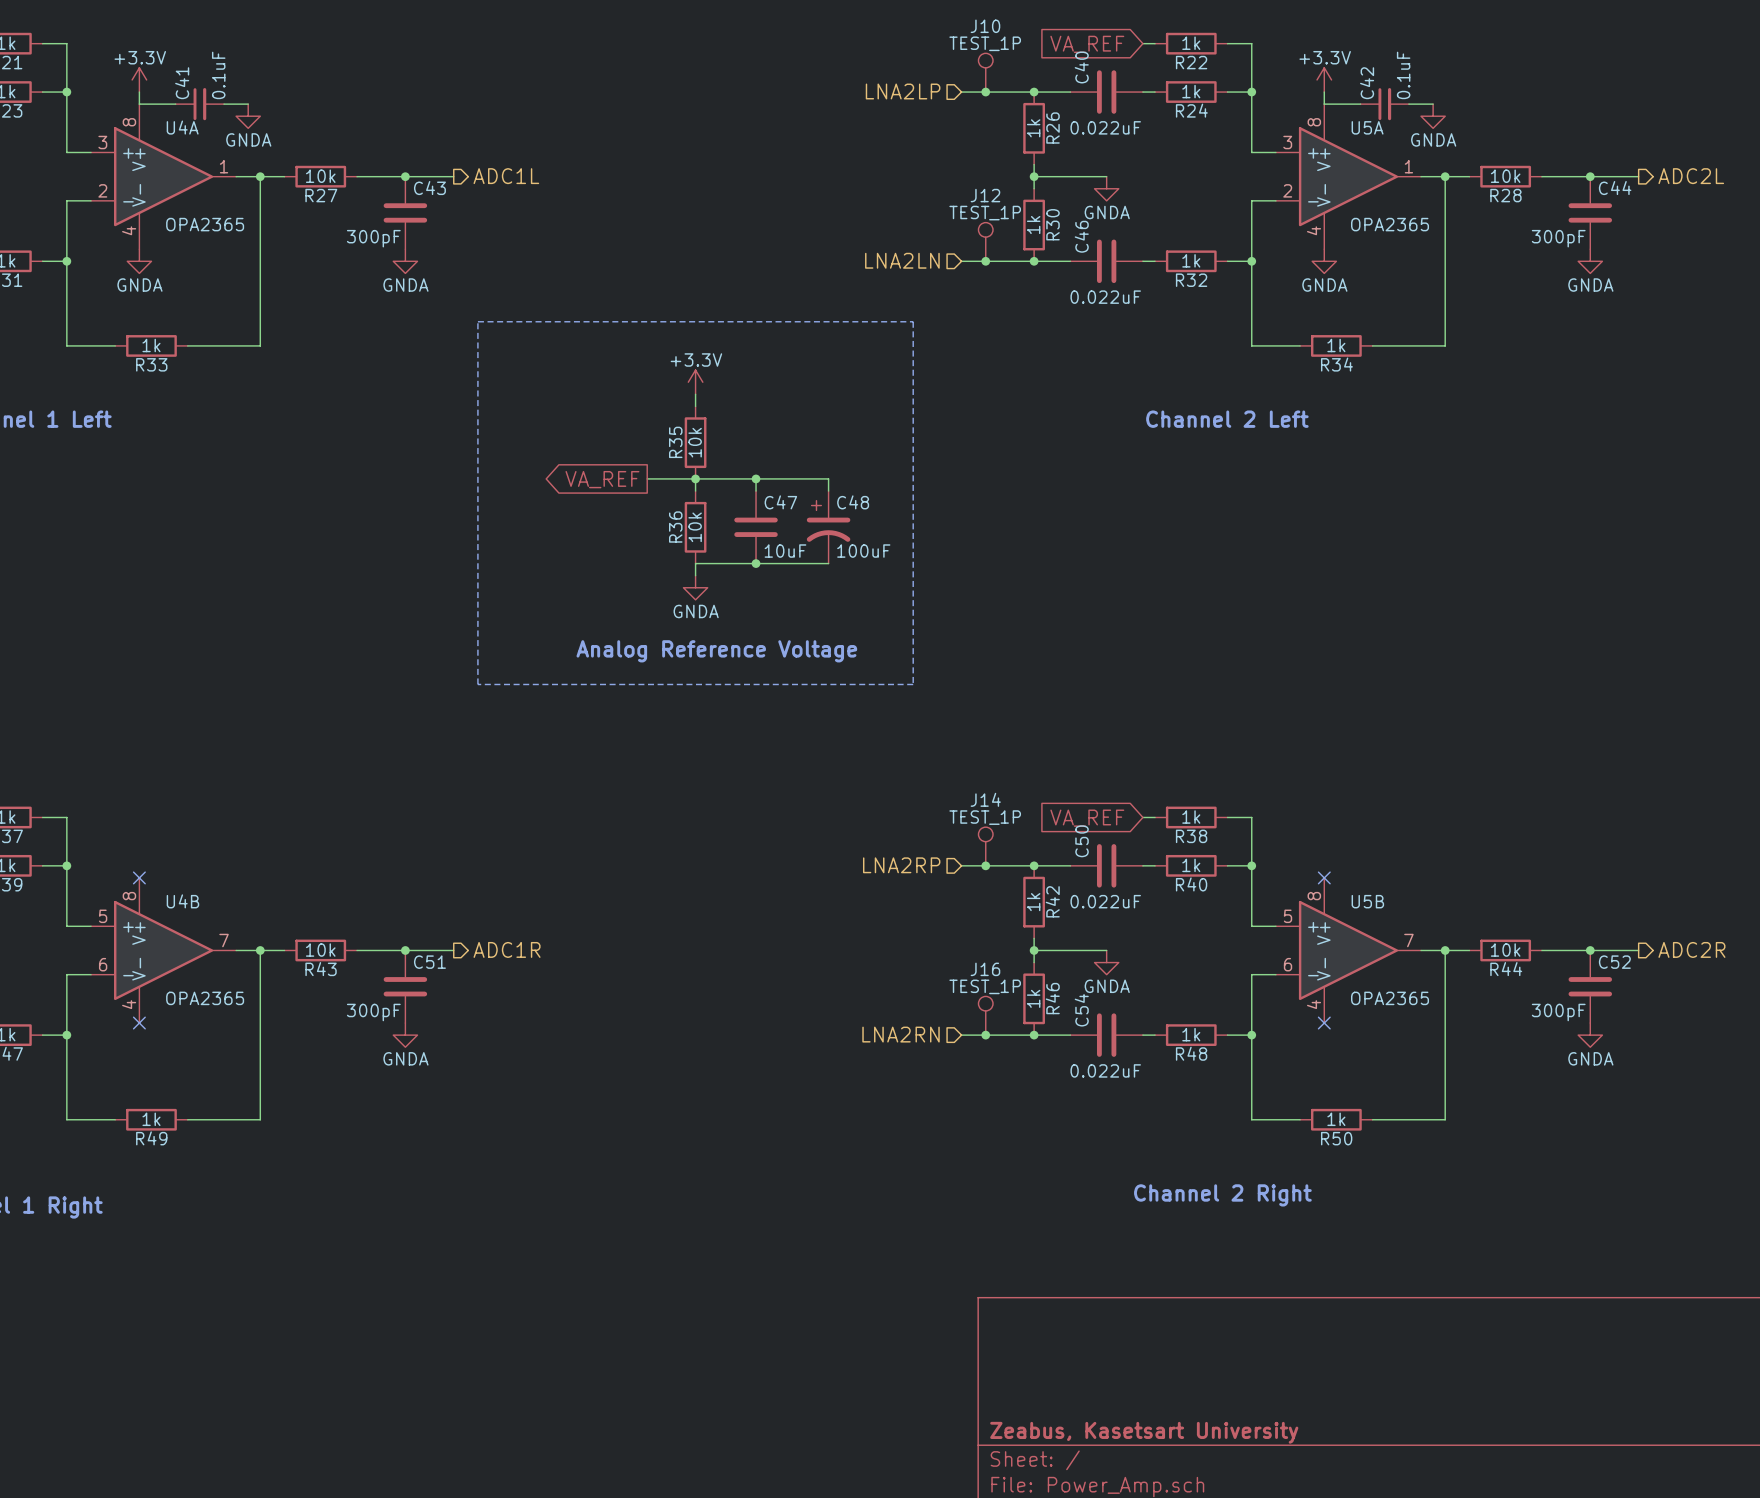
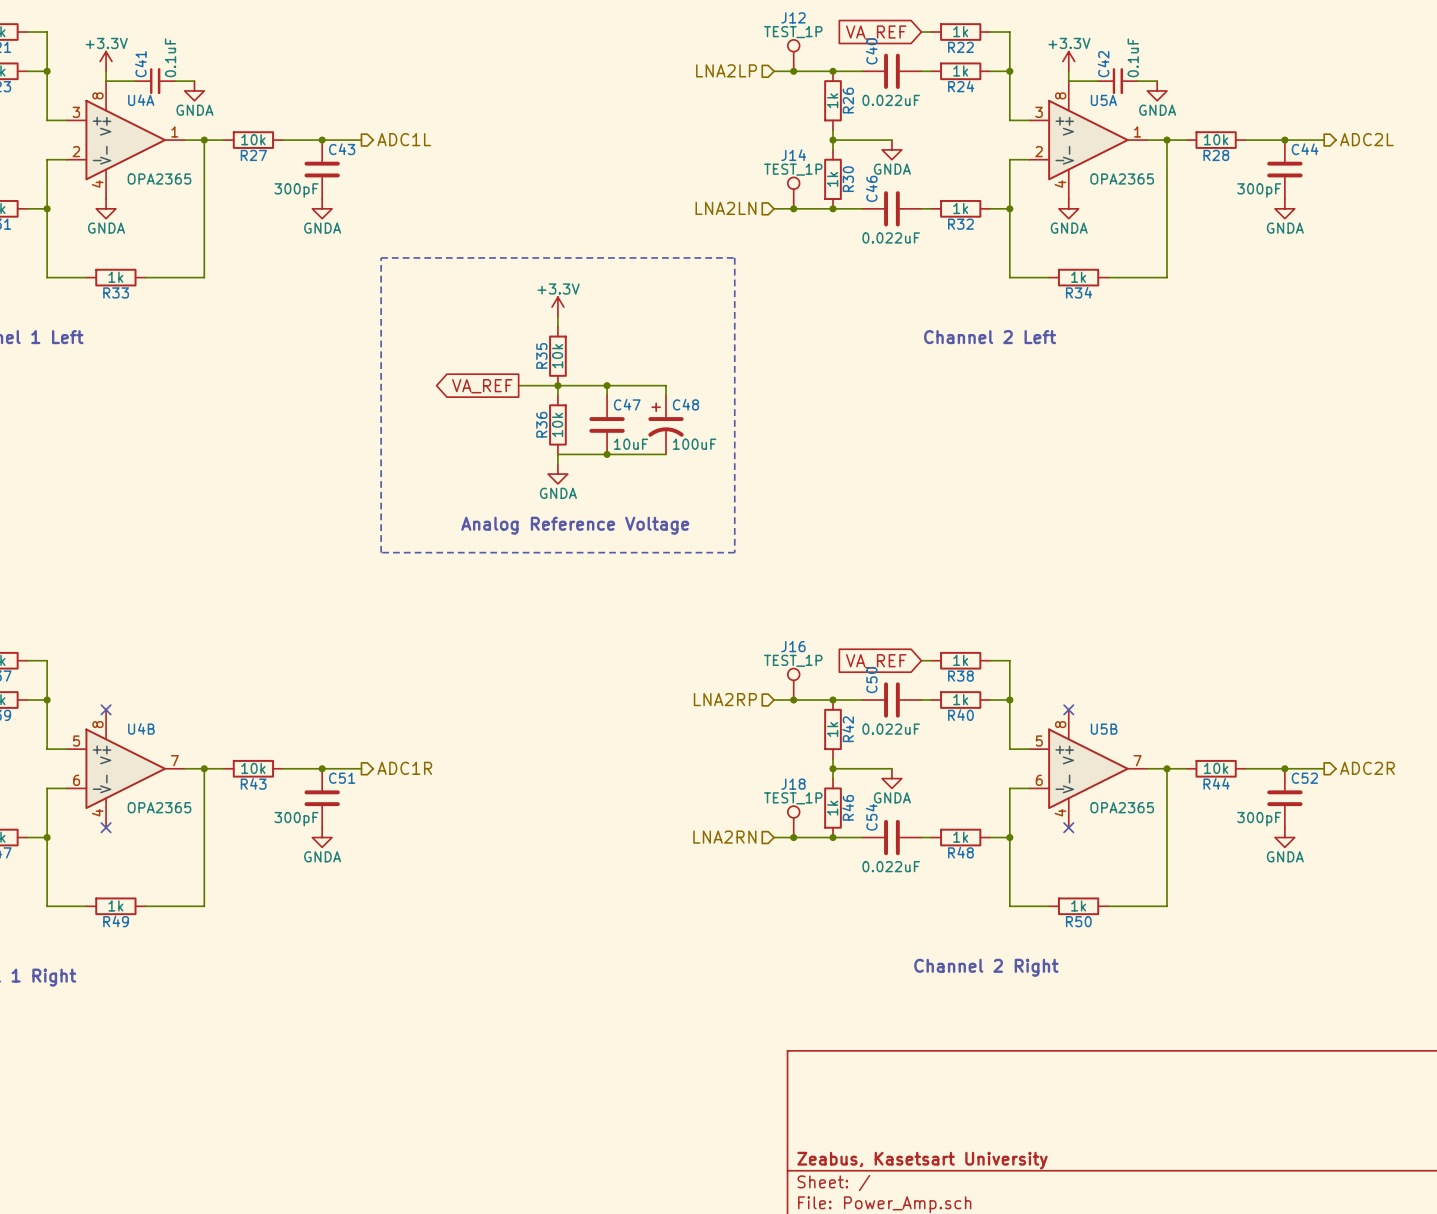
J10 name: J10 (985, 26) -> J12 (793, 17)
J12 name: J12 (985, 195) -> J14 (793, 155)
J14 name: J14 (985, 799) -> J16 (793, 646)
J16 name: J16 (985, 969) -> J18 (793, 784)

